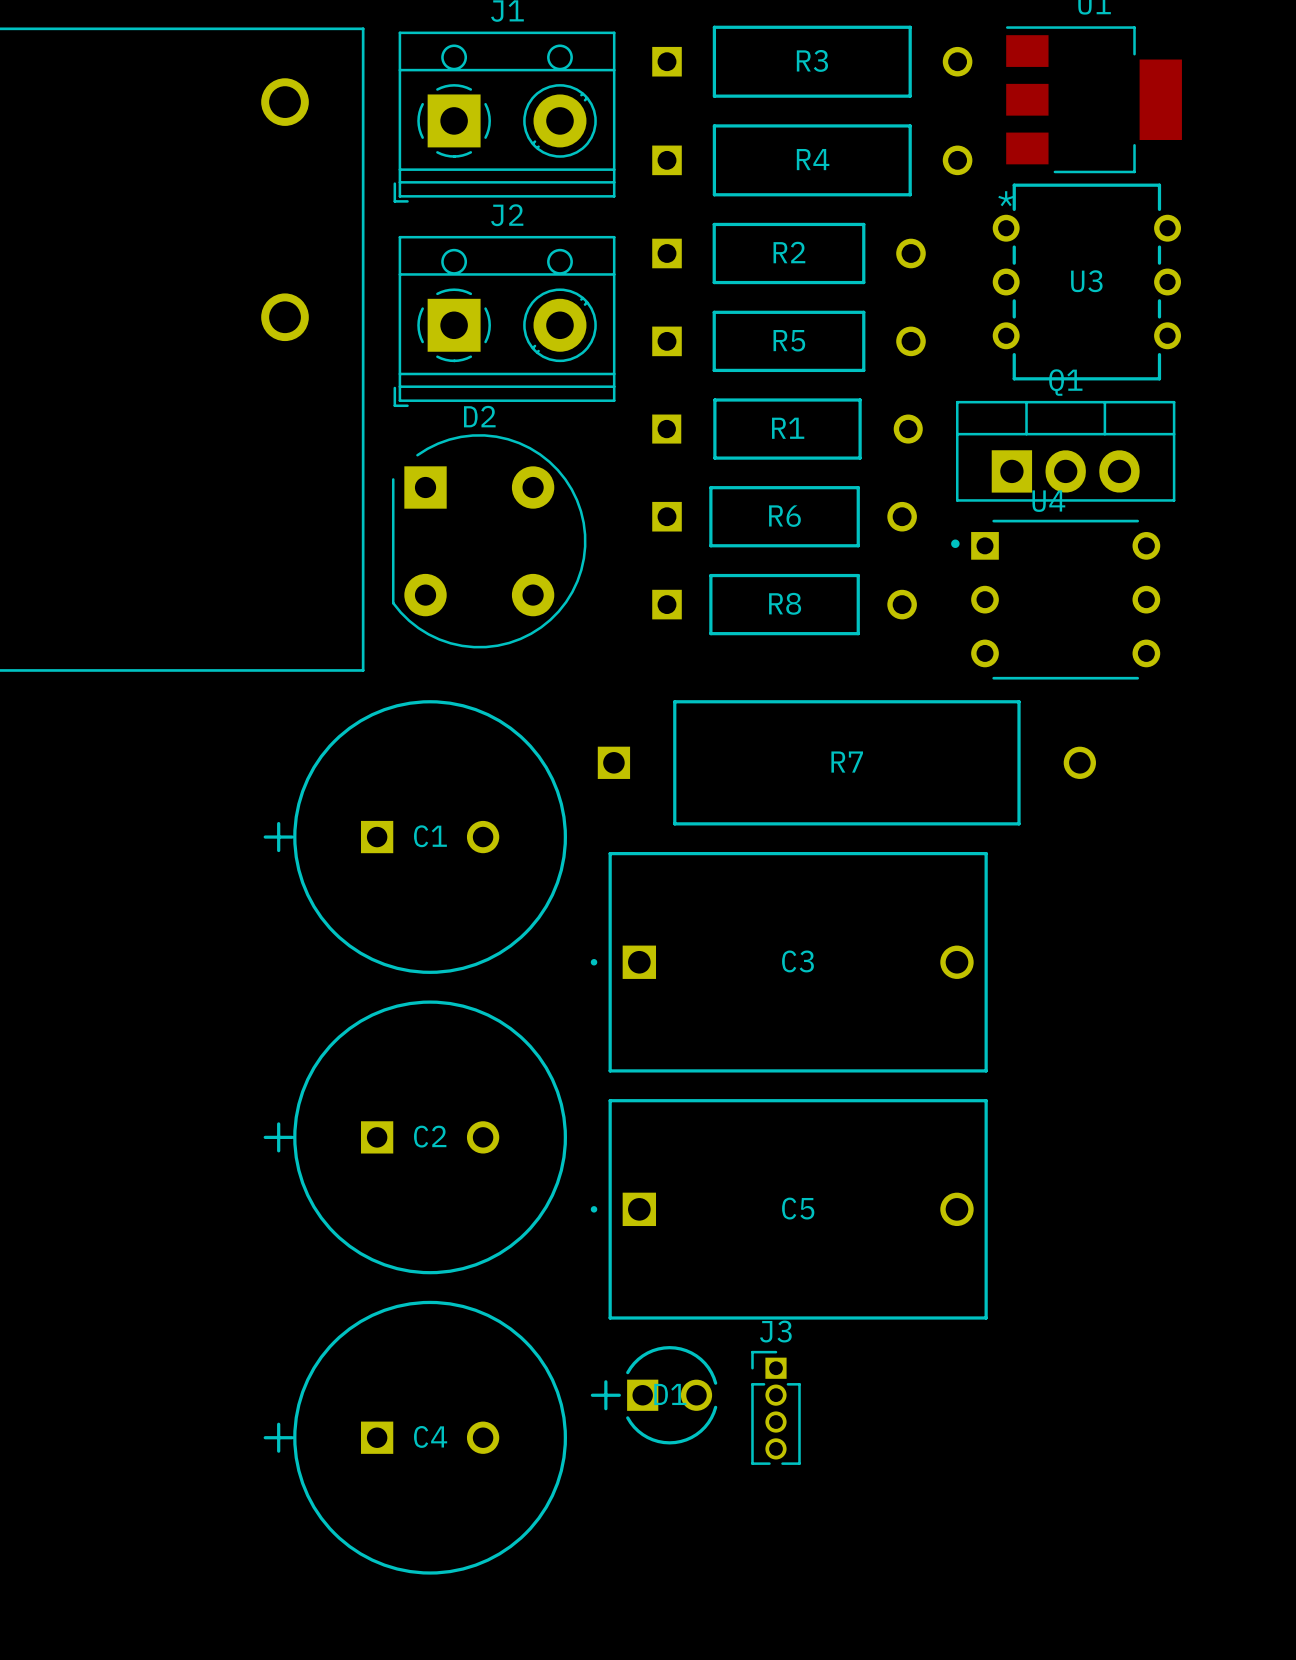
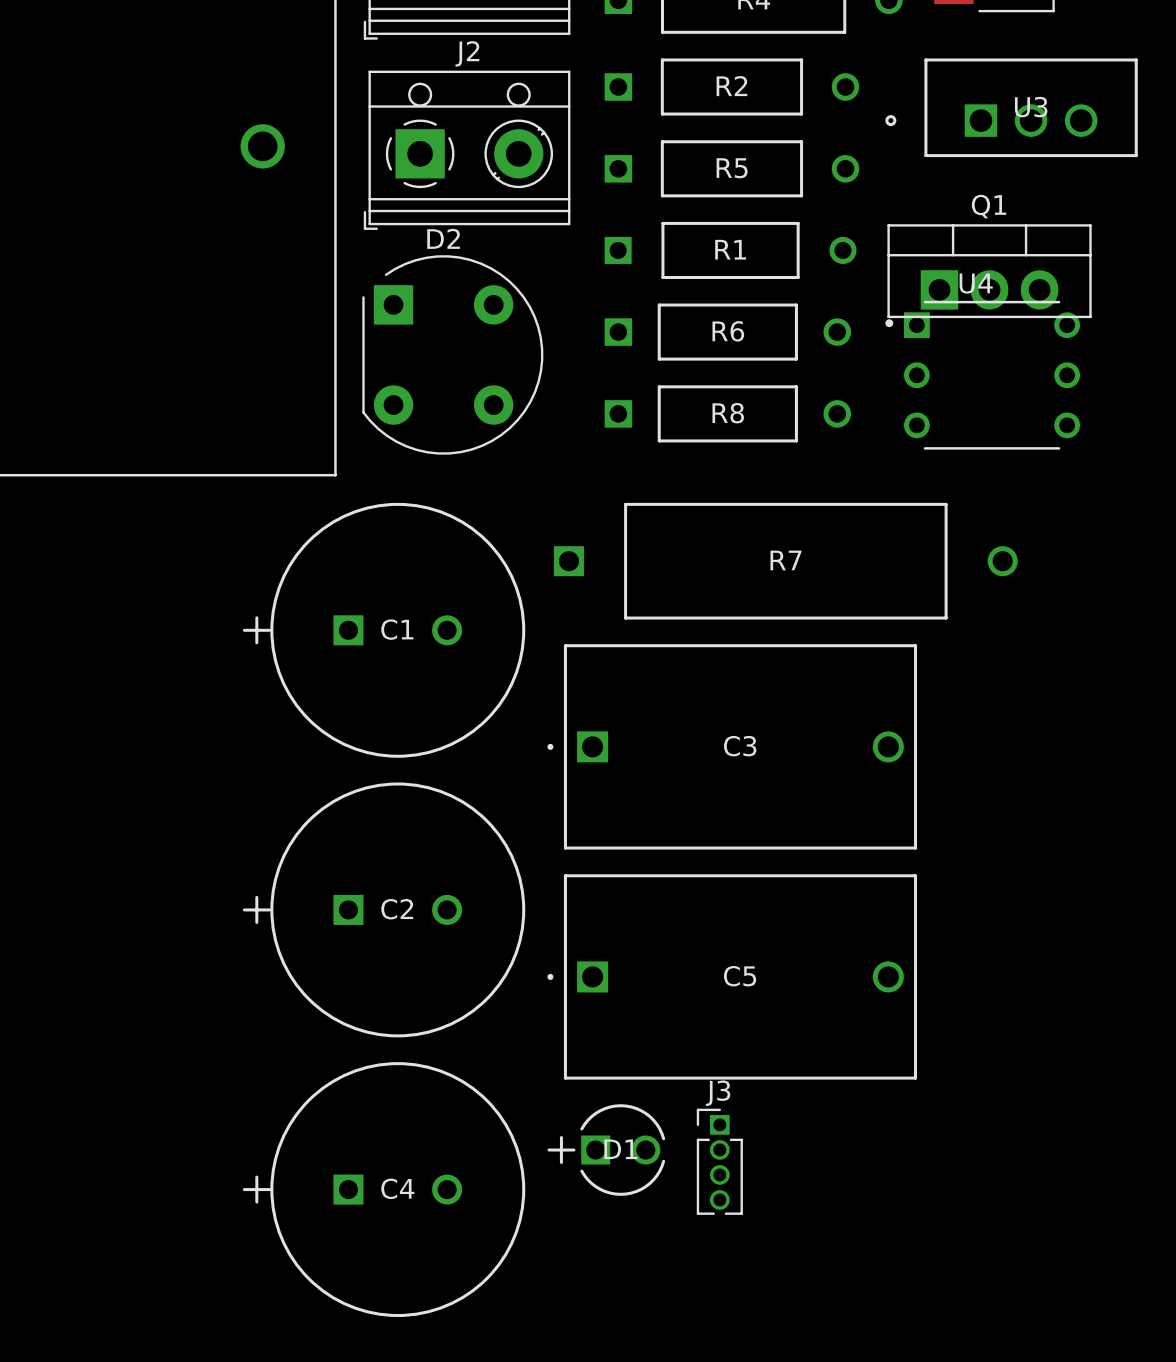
U3 footprint: [992, 183, 1181, 381] -> [885, 58, 1138, 158]
U4 position: (1055, 599) -> (982, 375)

